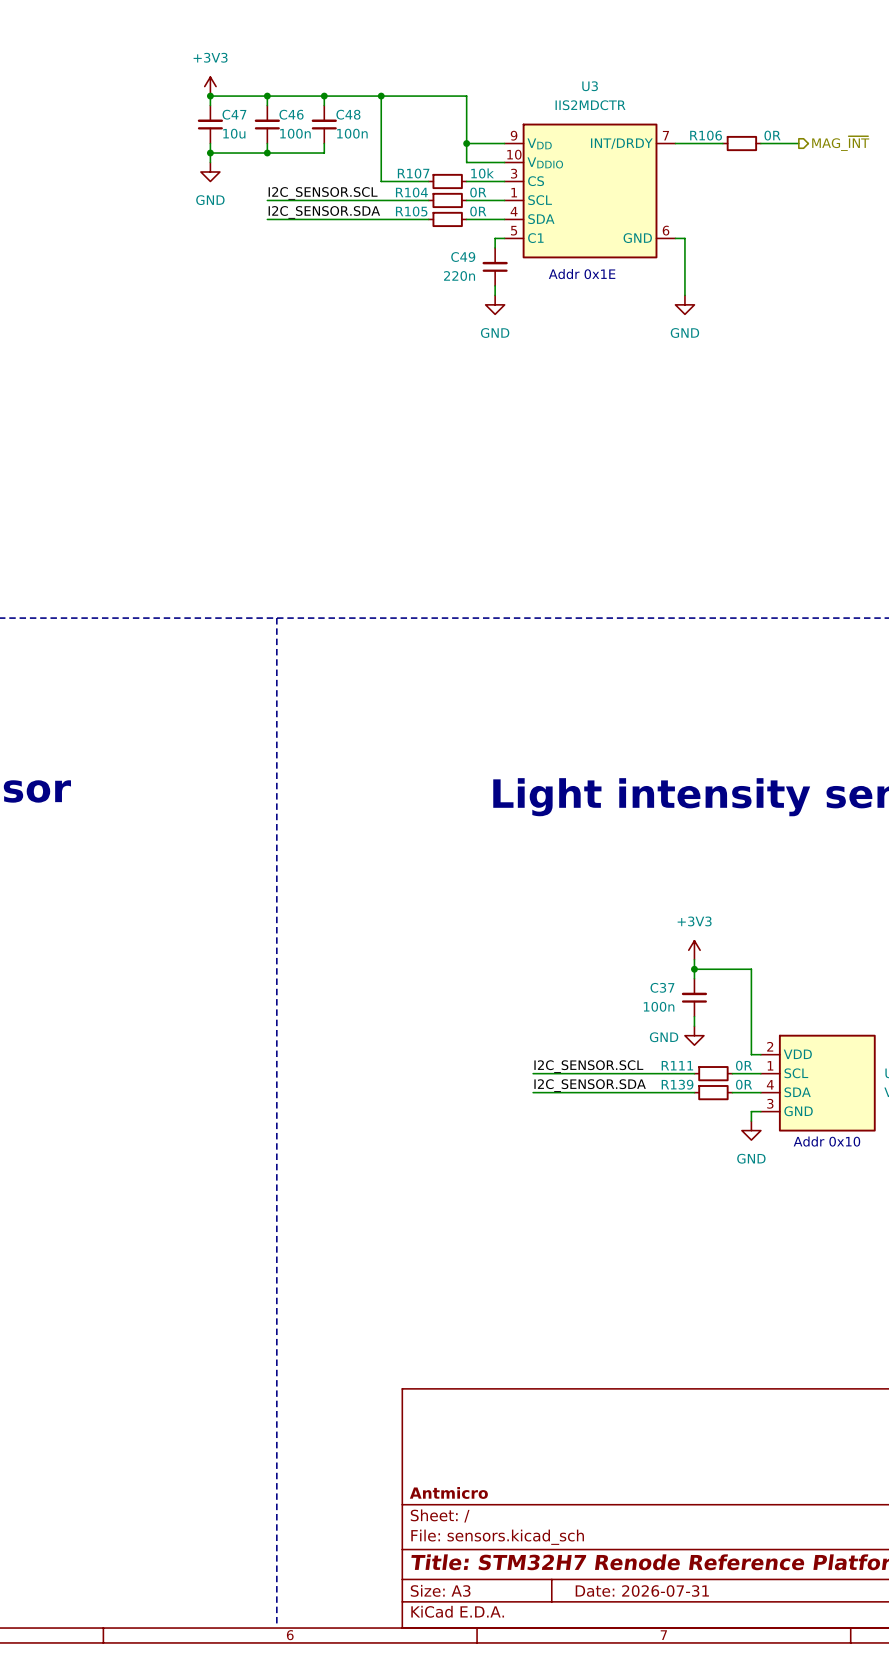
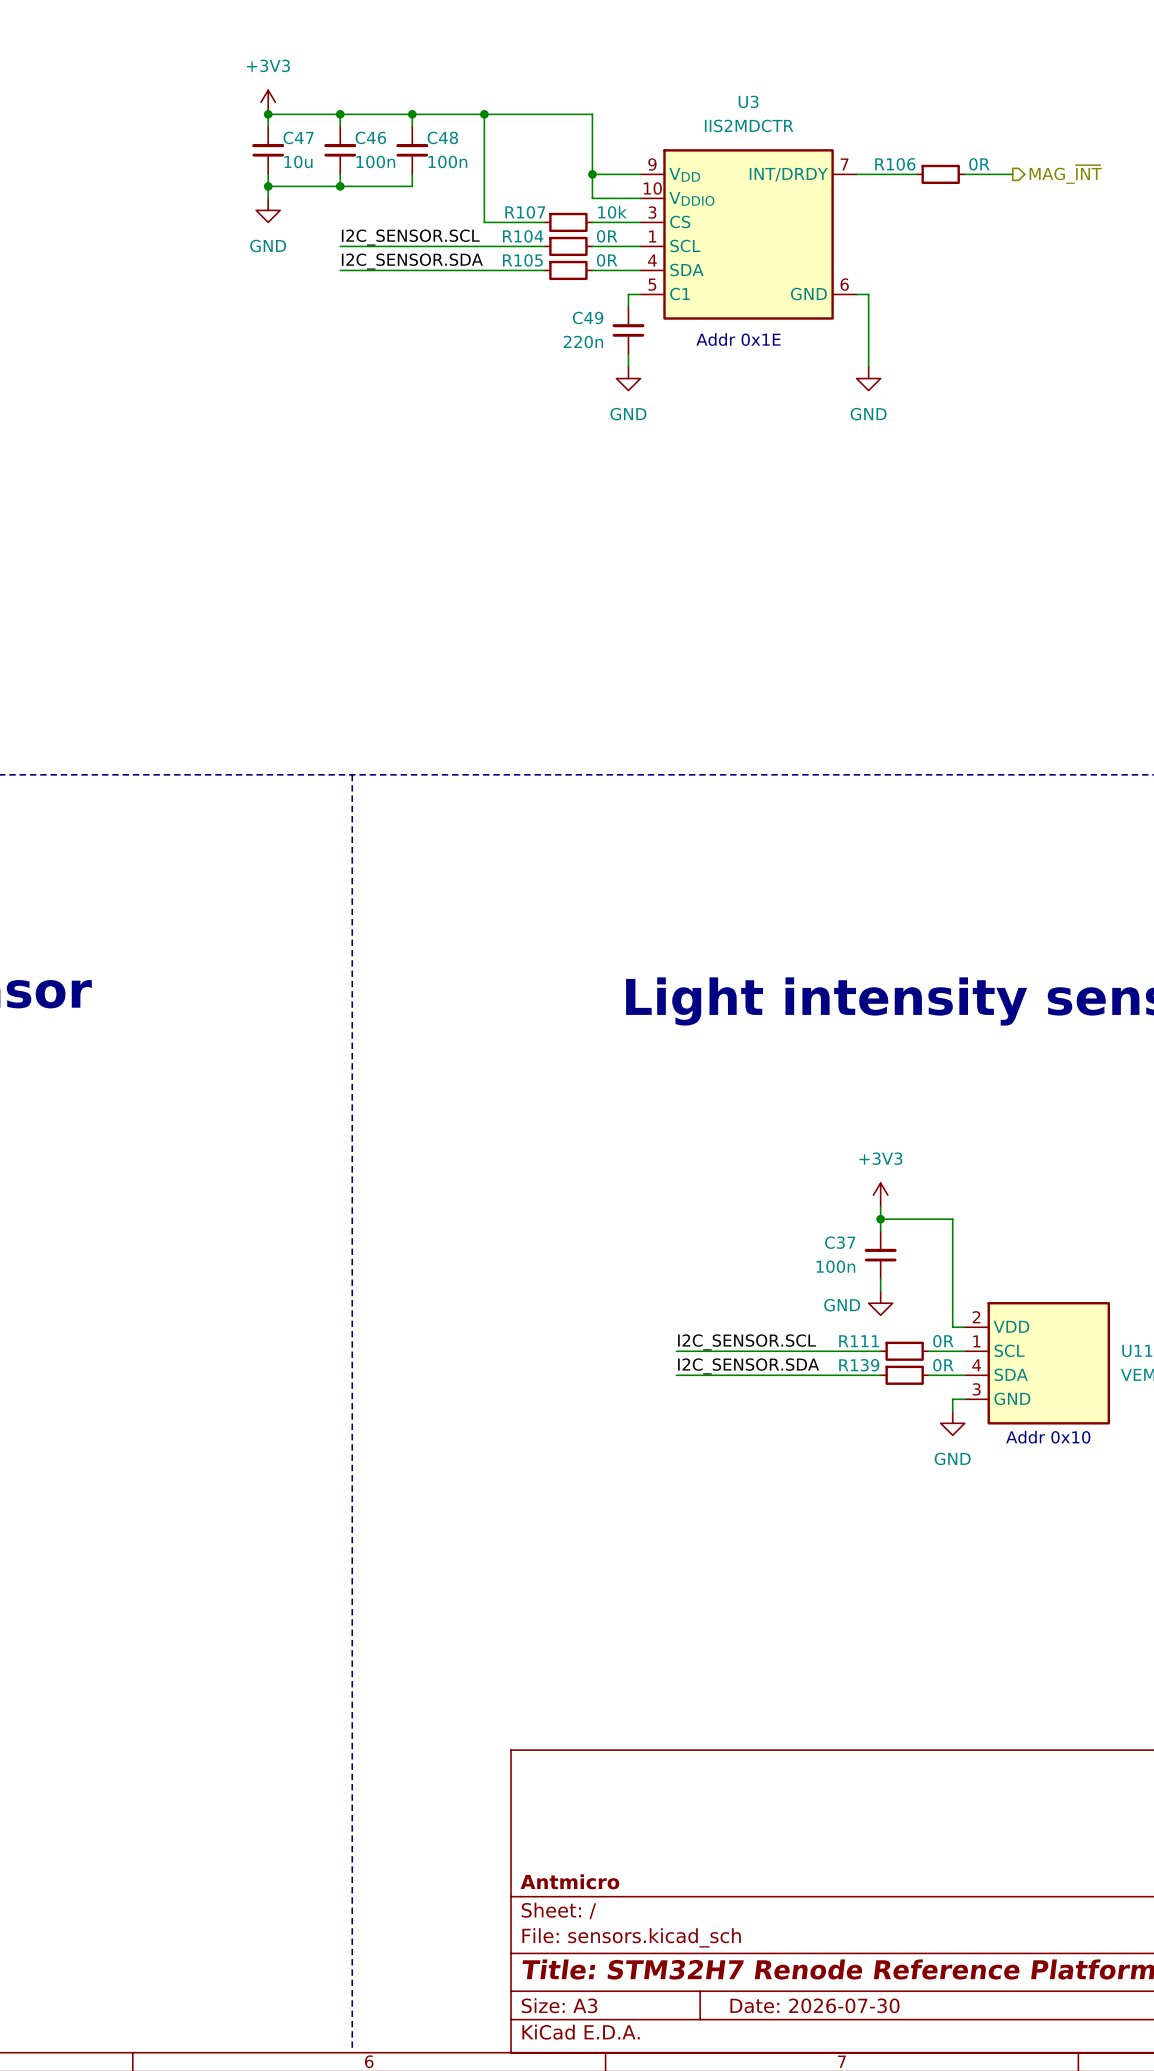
title block: Date: 2026-07-31 (642, 1590) -> Date: 2026-07-30 (814, 2005)

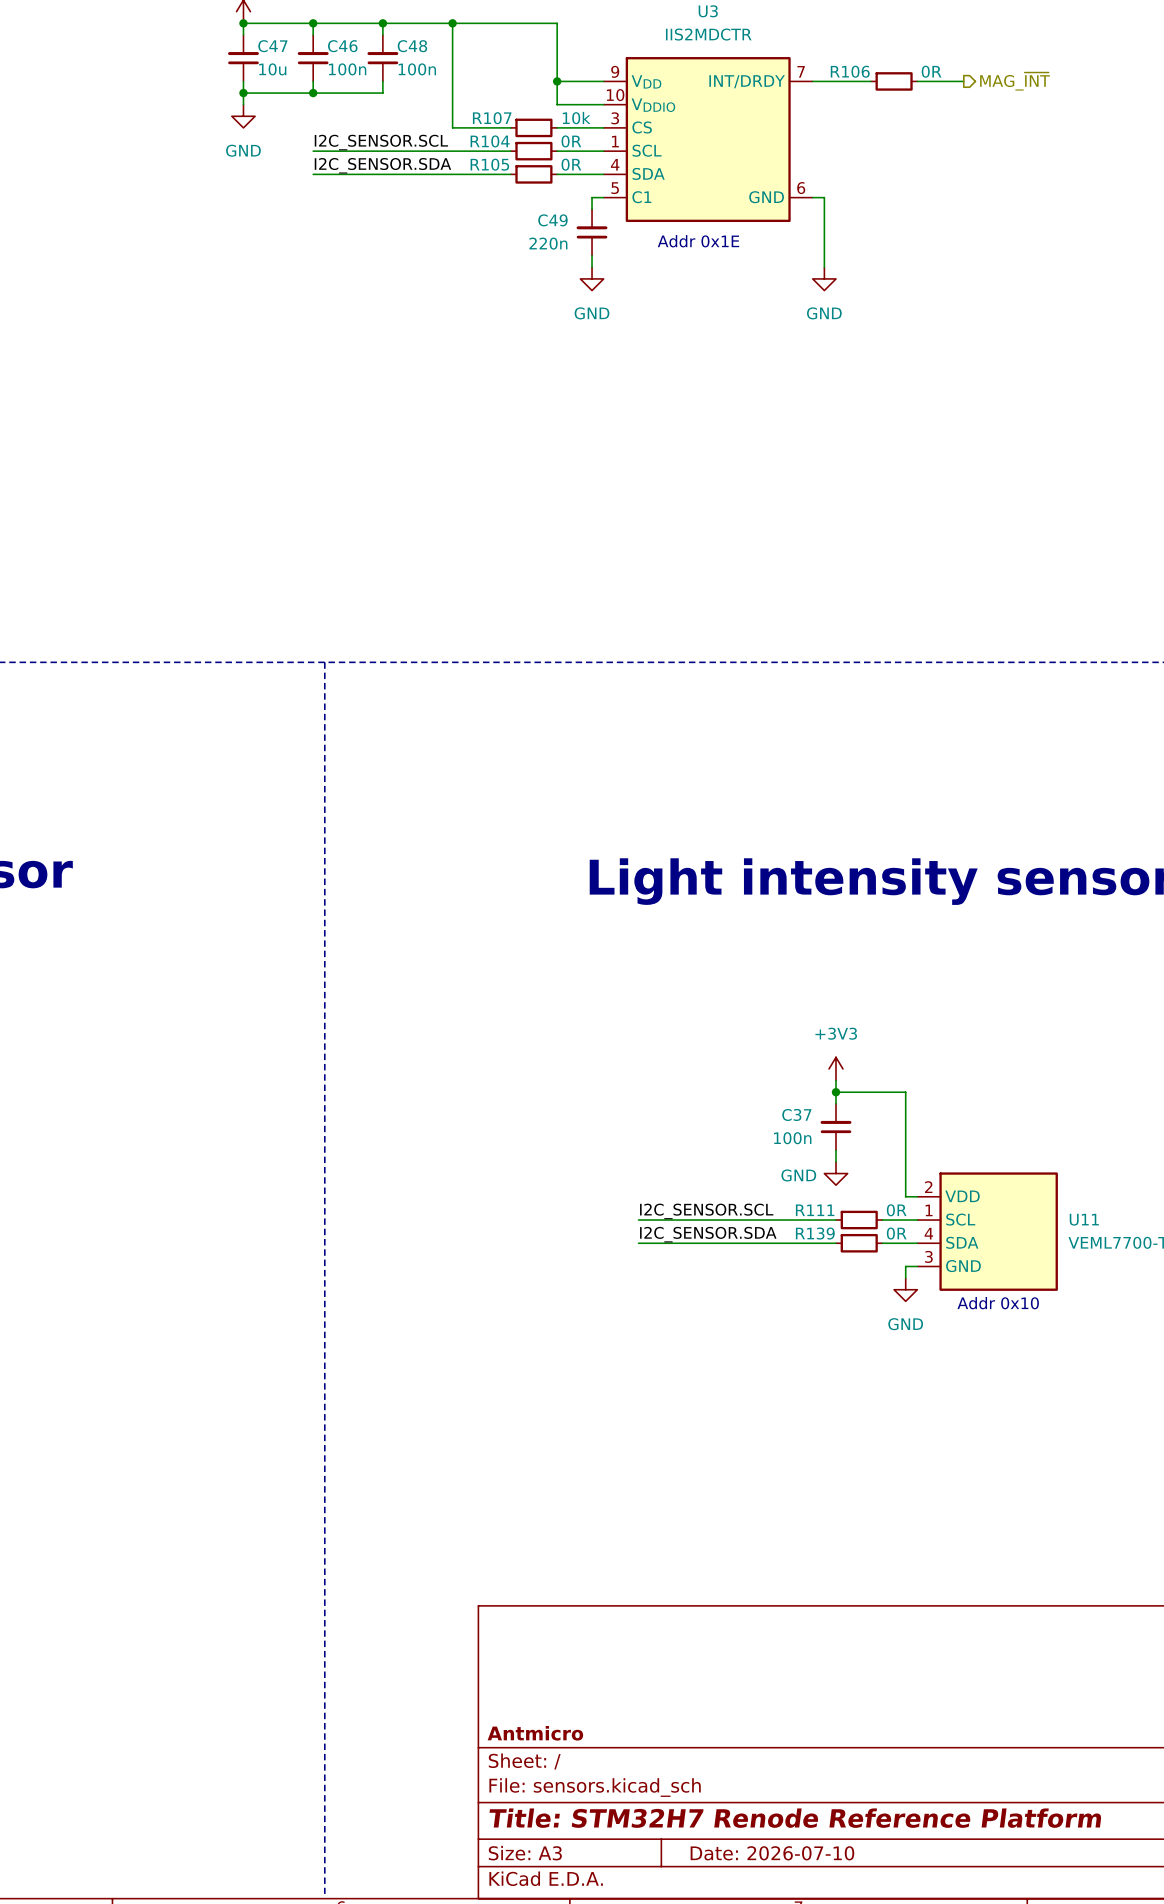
title block: Date: 2026-07-30 (814, 2005) -> Date: 2026-07-10 (772, 1853)

